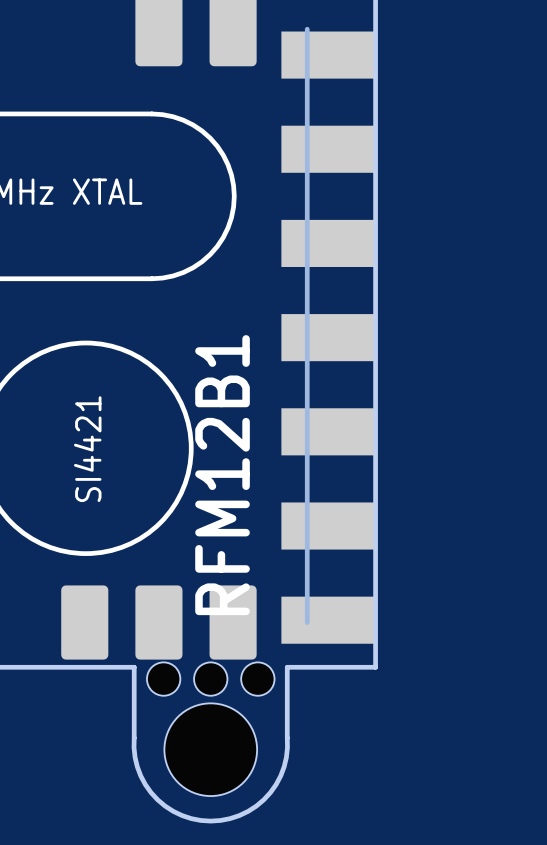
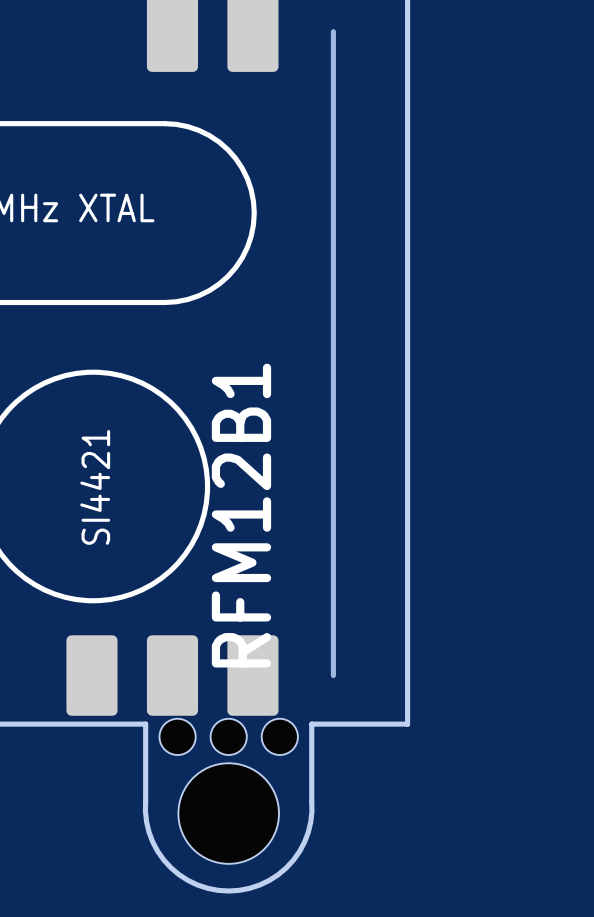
part: (328, 55) -> none
part: (328, 149) -> none
part: (328, 243) -> none
part: (328, 337) -> none
part: (328, 431) -> none
part: (328, 526) -> none
part: (328, 620) -> none

